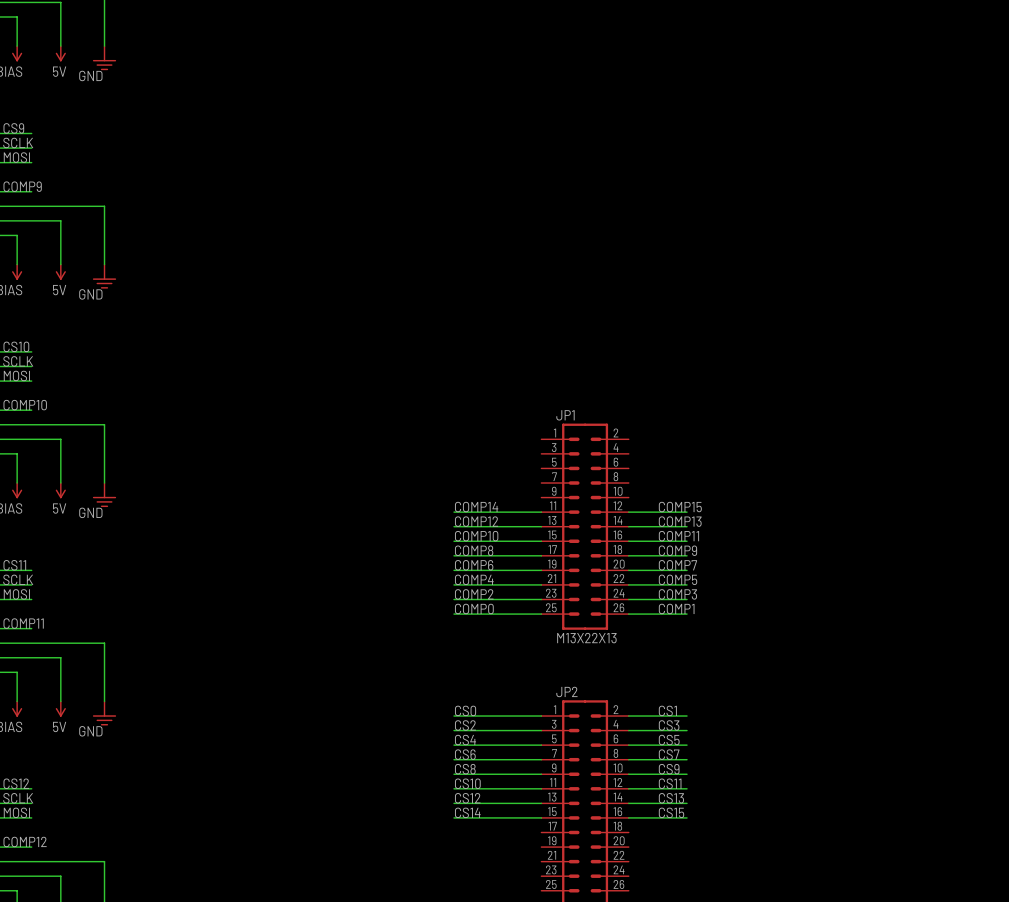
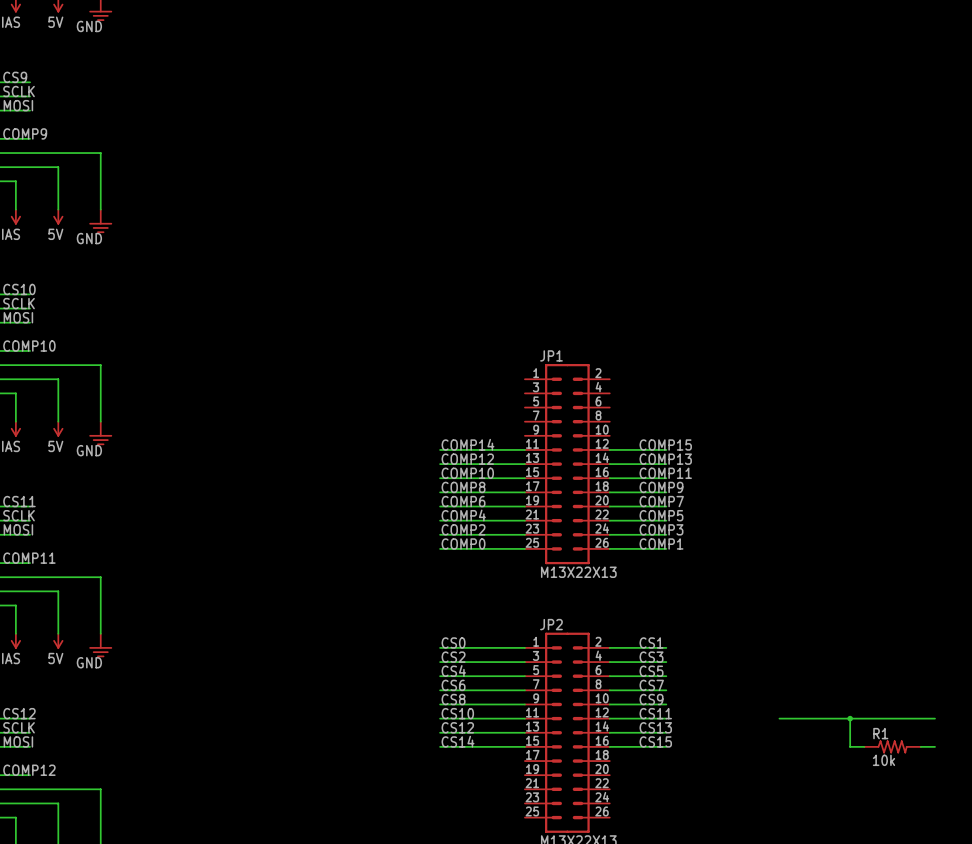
wire: none -> (779, 718) (934, 718)
wire: none -> (850, 718) (850, 746) (864, 746)
junction: none -> (850, 718)
R1: none -> 10k (892, 746)
wire: none -> (920, 746) (934, 746)

